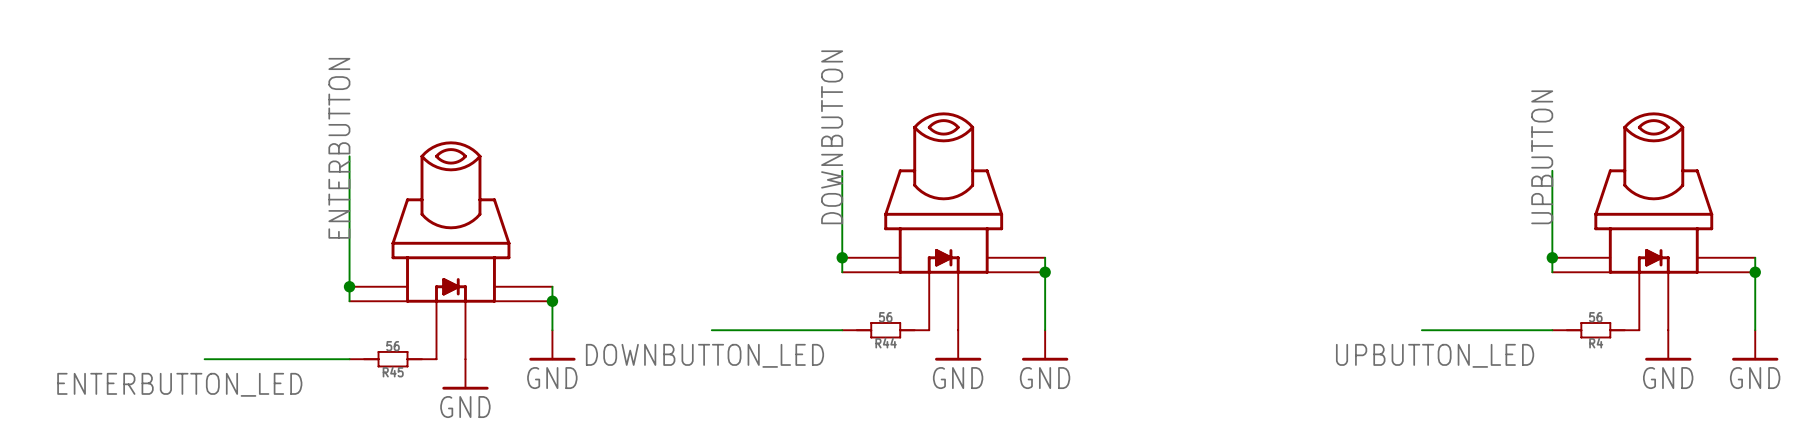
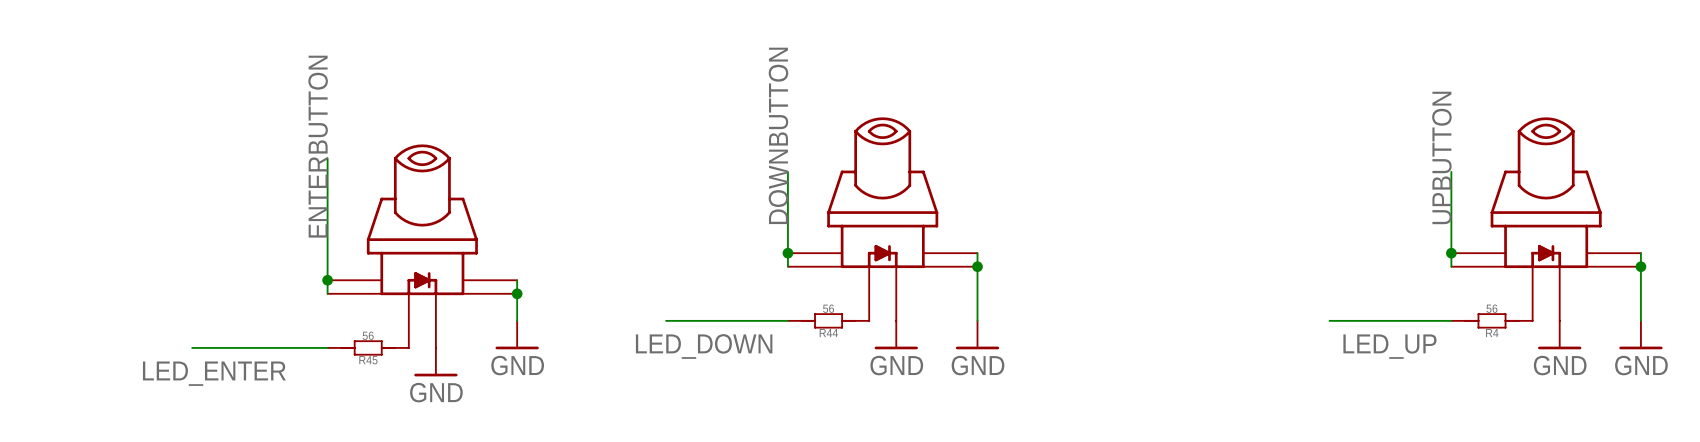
label: DOWNBUTTON_LED (704, 355) -> LED_DOWN (704, 346)
label: UPBUTTON_LED (1435, 355) -> LED_UP (1389, 346)
label: ENTERBUTTON_LED (179, 384) -> LED_ENTER (214, 373)

